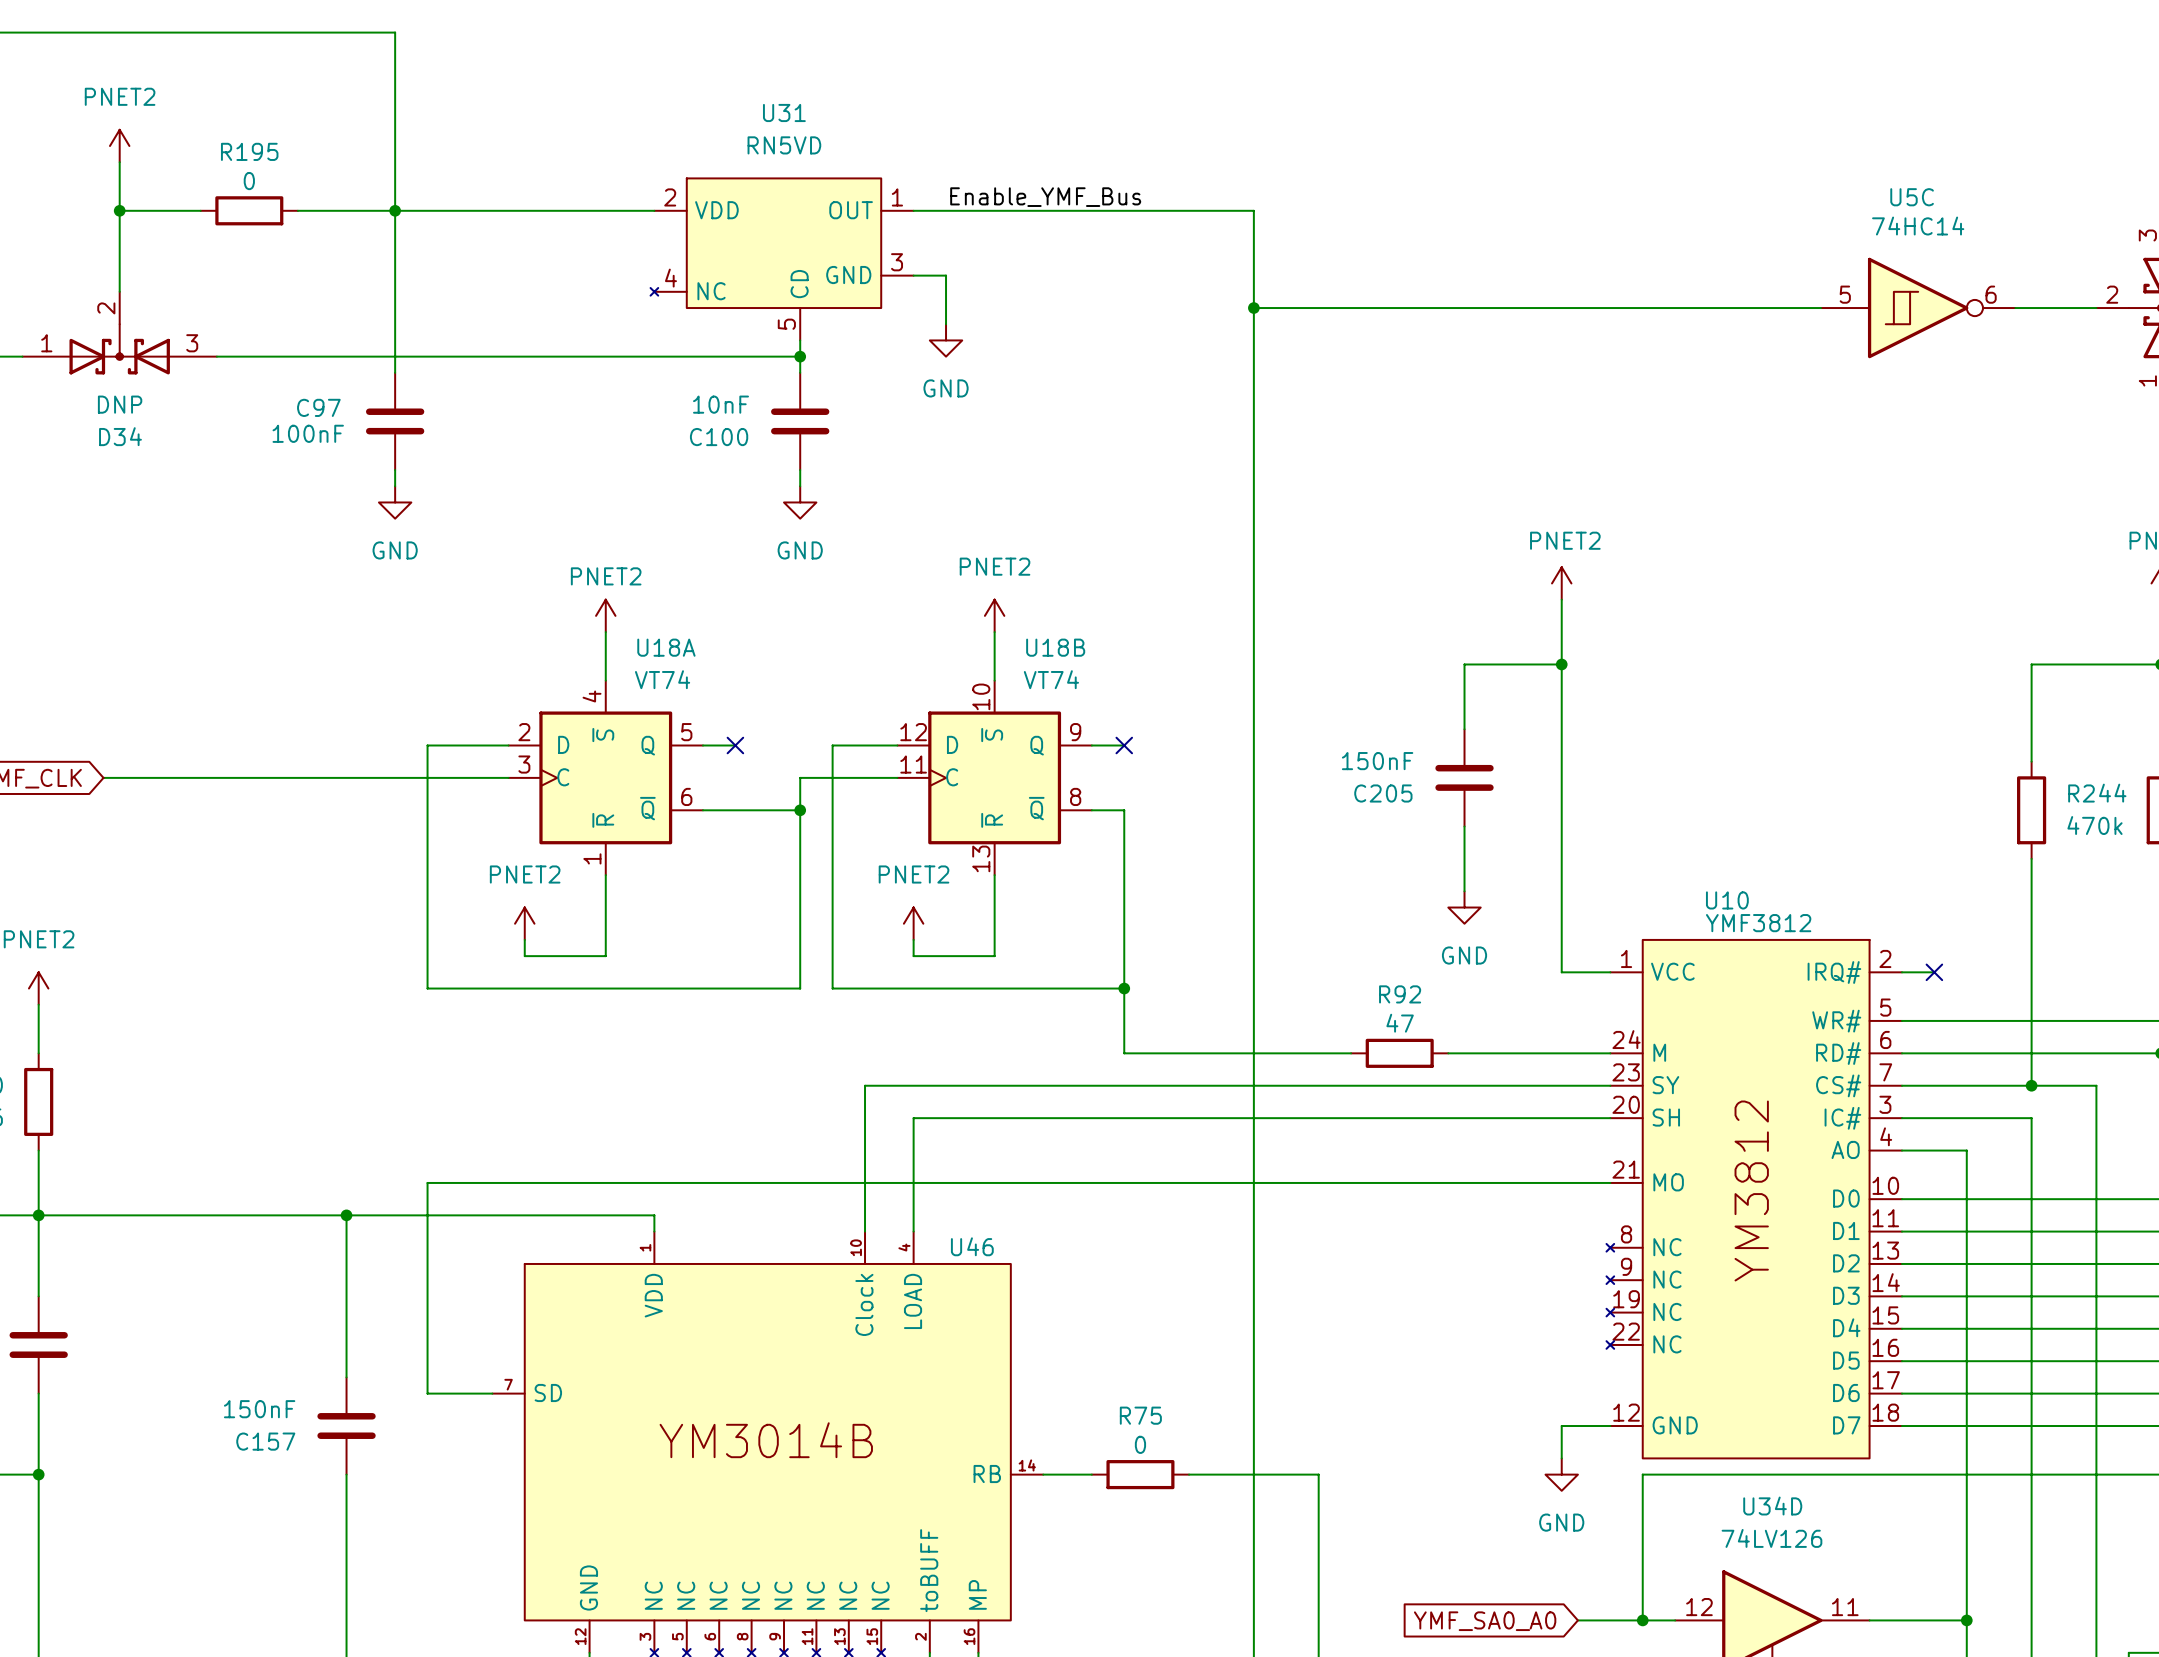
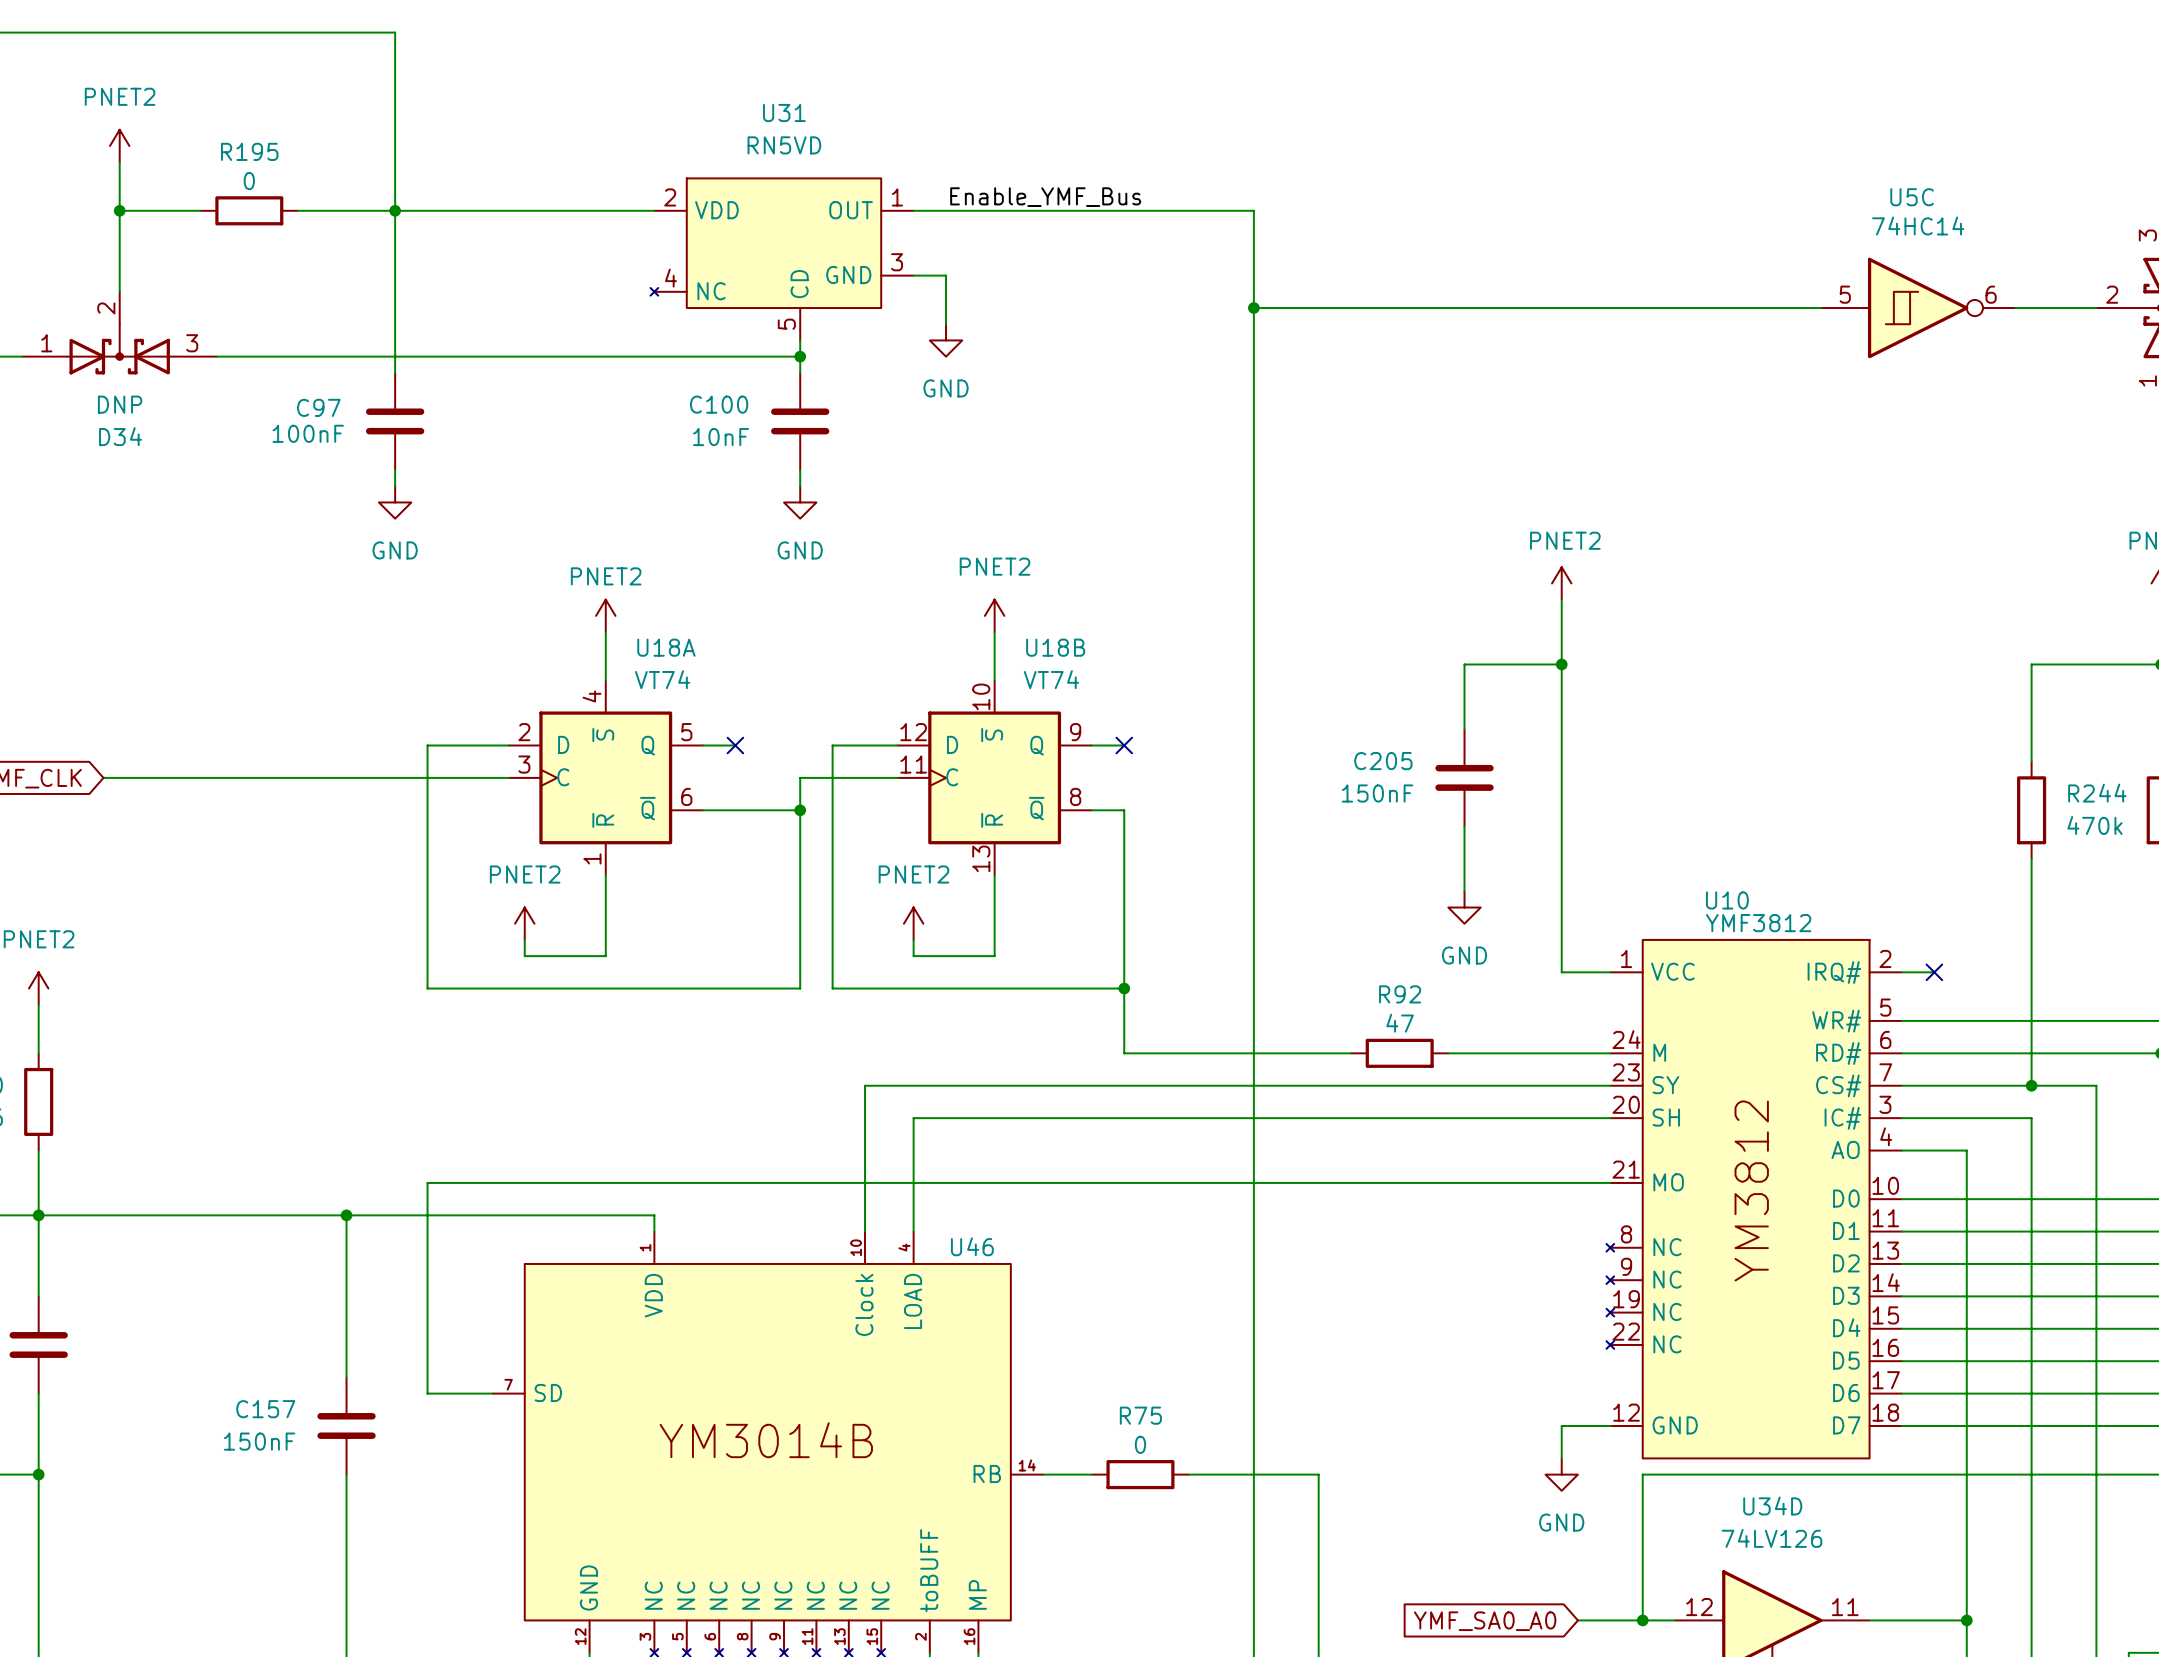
C100 value position: 10nF (721, 404) -> 10nF (721, 437)
C100 name position: C100 (719, 437) -> C100 (719, 404)
C205 value position: 150nF (1377, 761) -> 150nF (1377, 793)
C205 name position: C205 (1383, 793) -> C205 (1383, 761)
C157 value position: 150nF (259, 1409) -> 150nF (259, 1441)
C157 name position: C157 (265, 1441) -> C157 (265, 1409)

